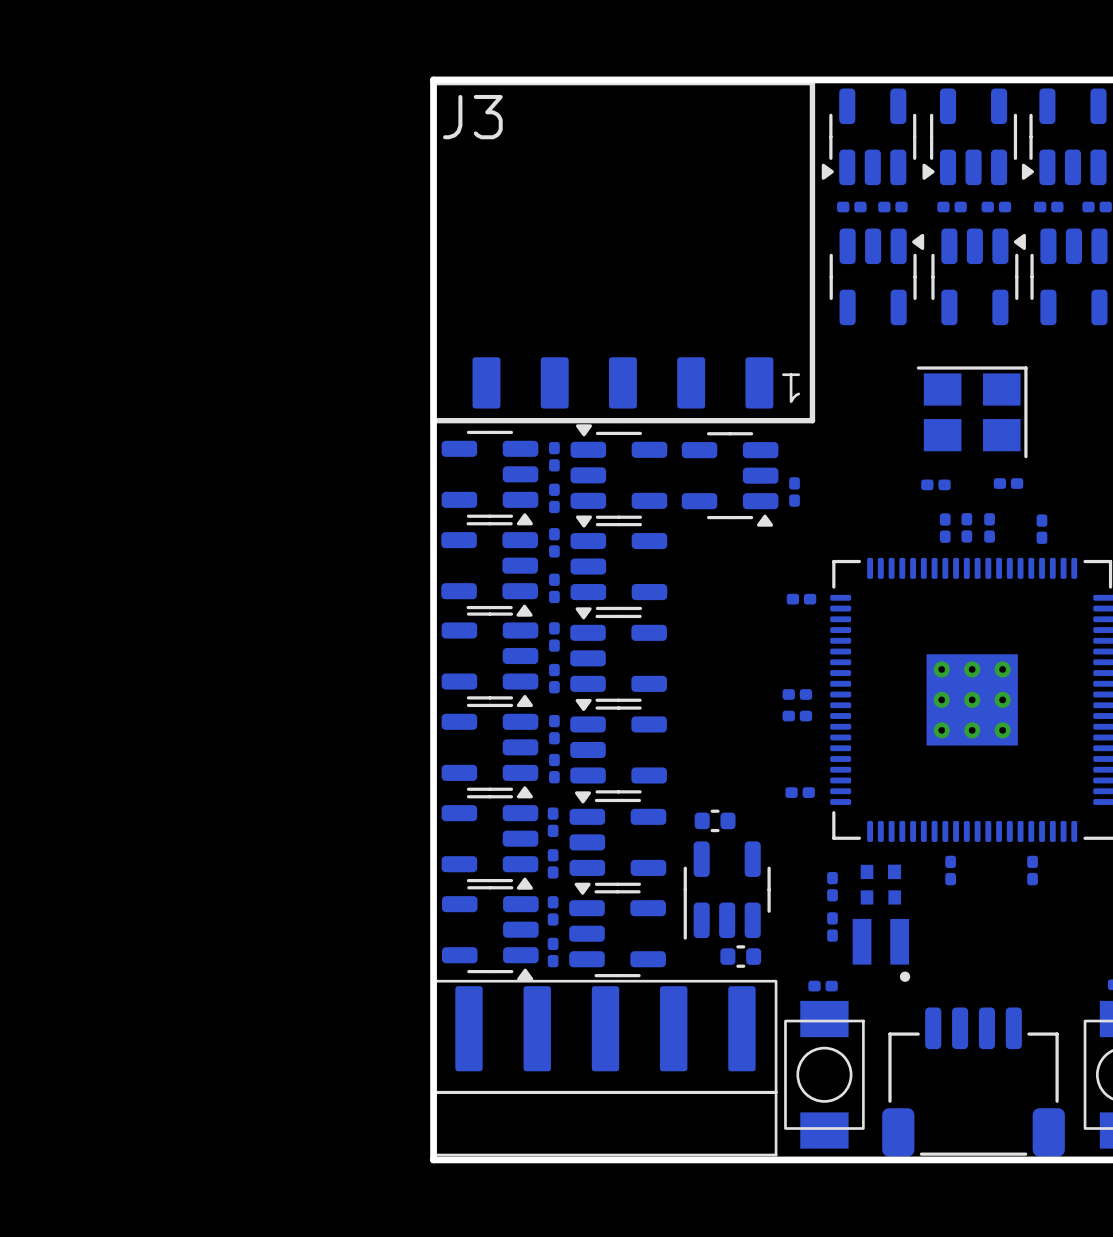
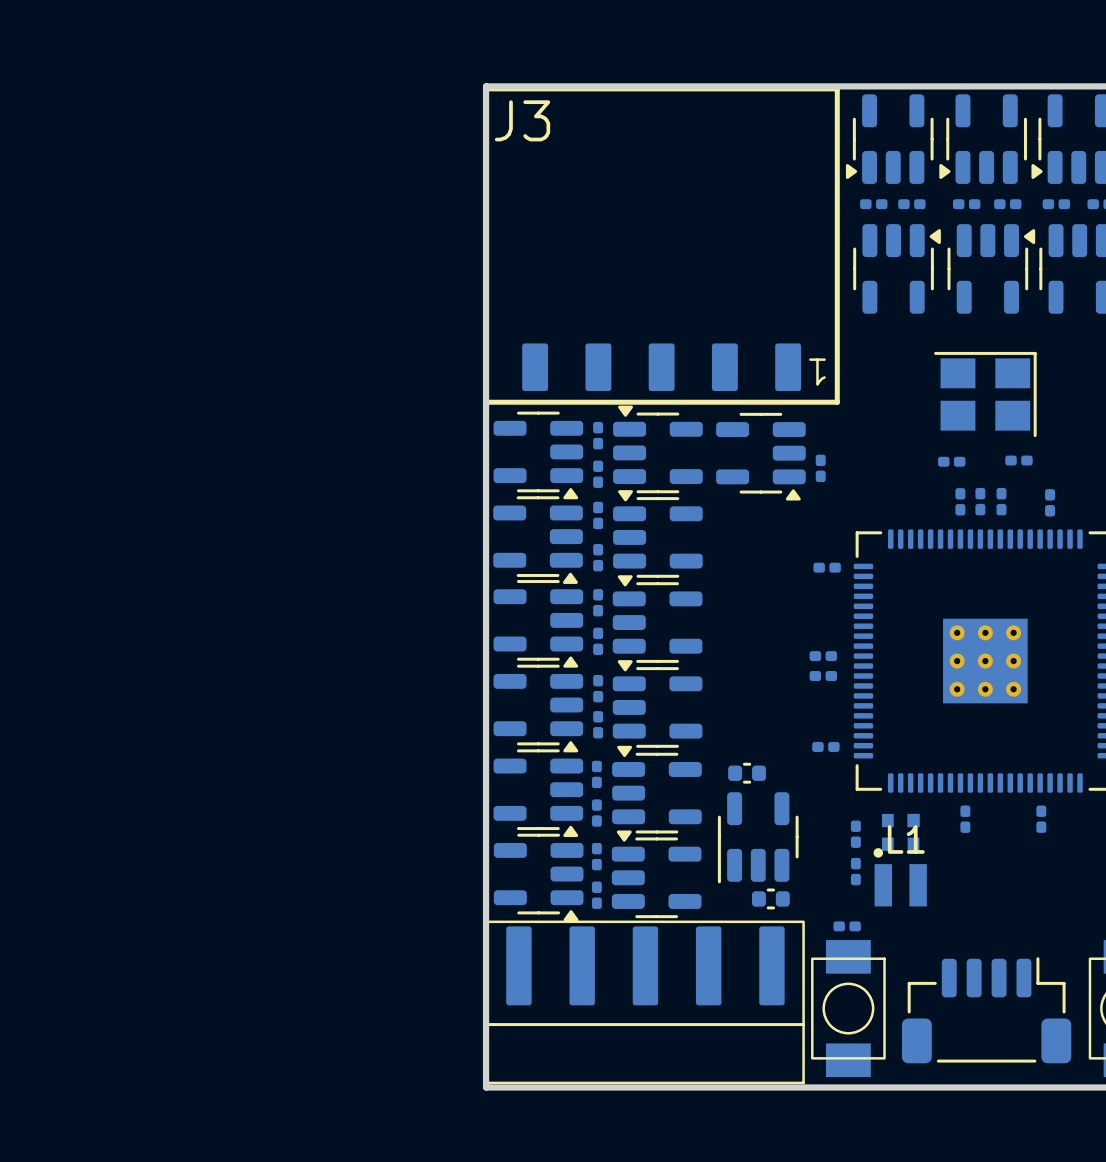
L1: none -> (900, 877)
part: (881, 950) -> none
part footprint: [882, 1007, 1065, 1157] -> [901, 957, 1072, 1064]

